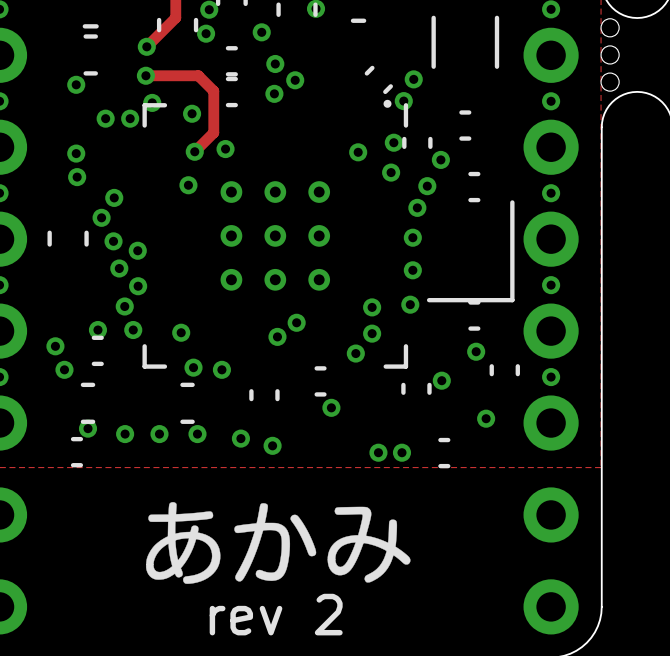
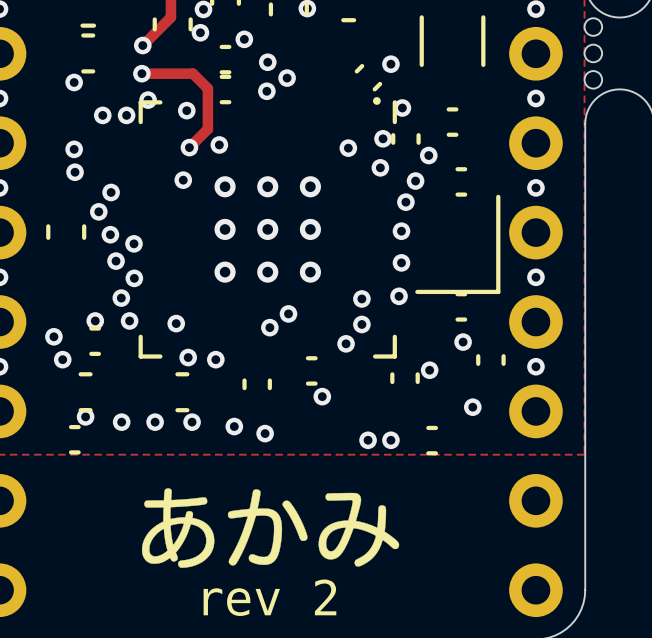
via position: (261, 32) -> (244, 39)
via position: (413, 79) -> (390, 64)
via position: (403, 101) -> (402, 108)

